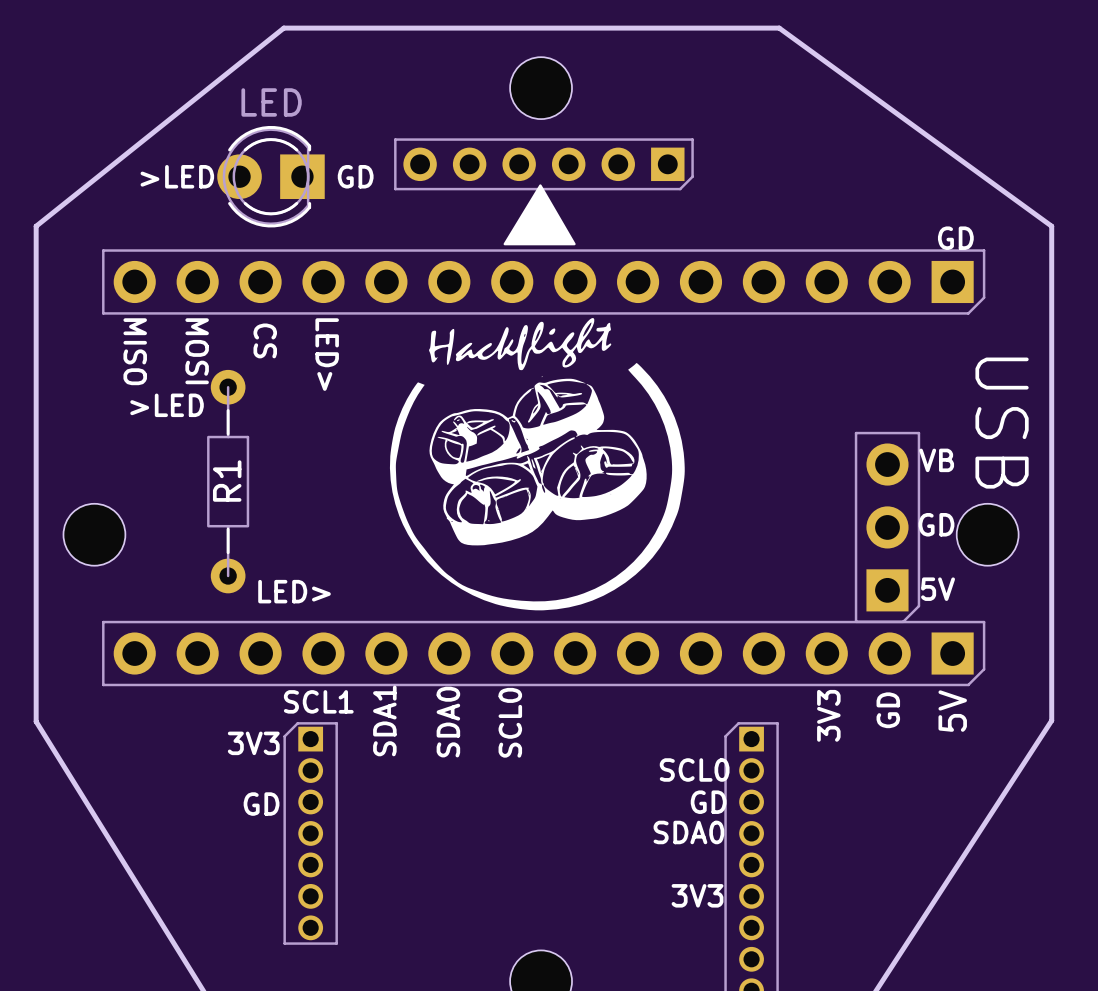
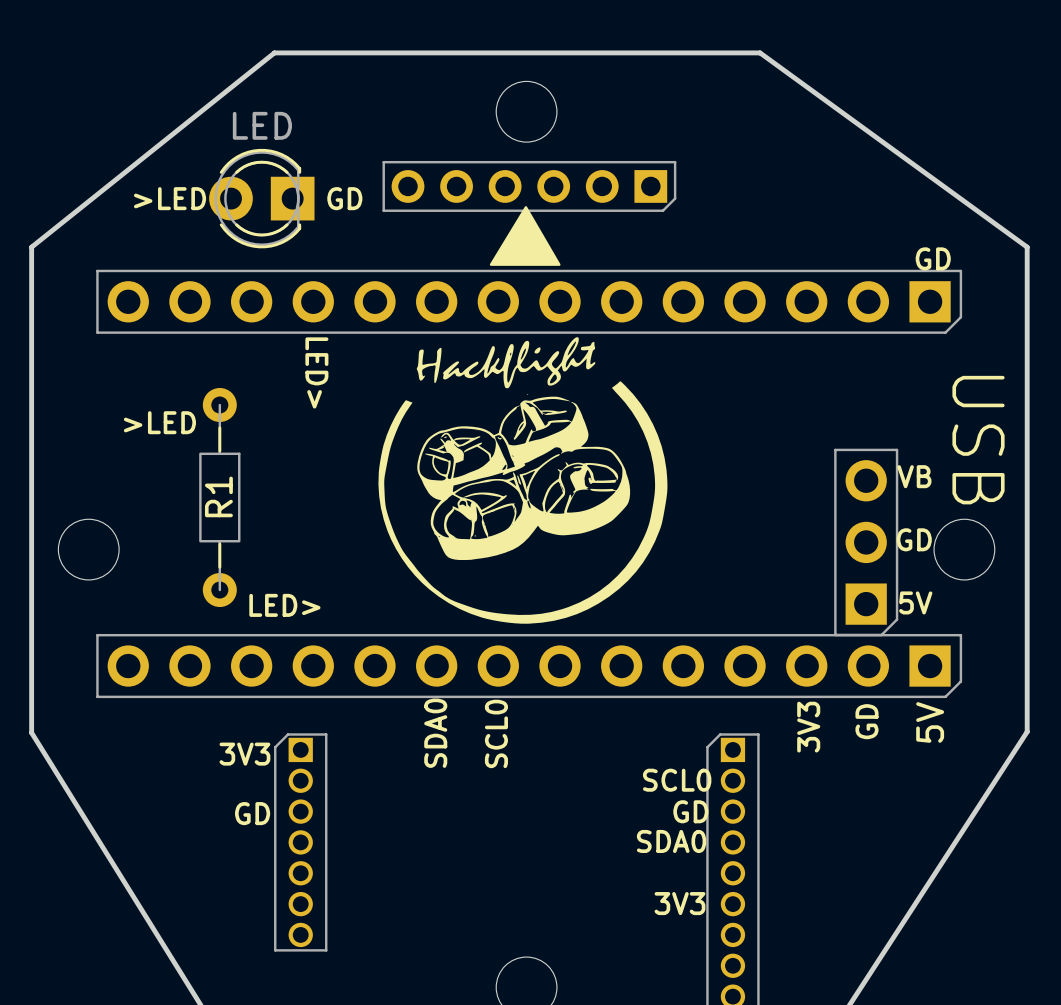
text: CS (265, 340) -> none
text: MISO (135, 351) -> none
text: MOSI (197, 351) -> none
text: SCL1 (318, 701) -> none
text: SDA1 (384, 720) -> none

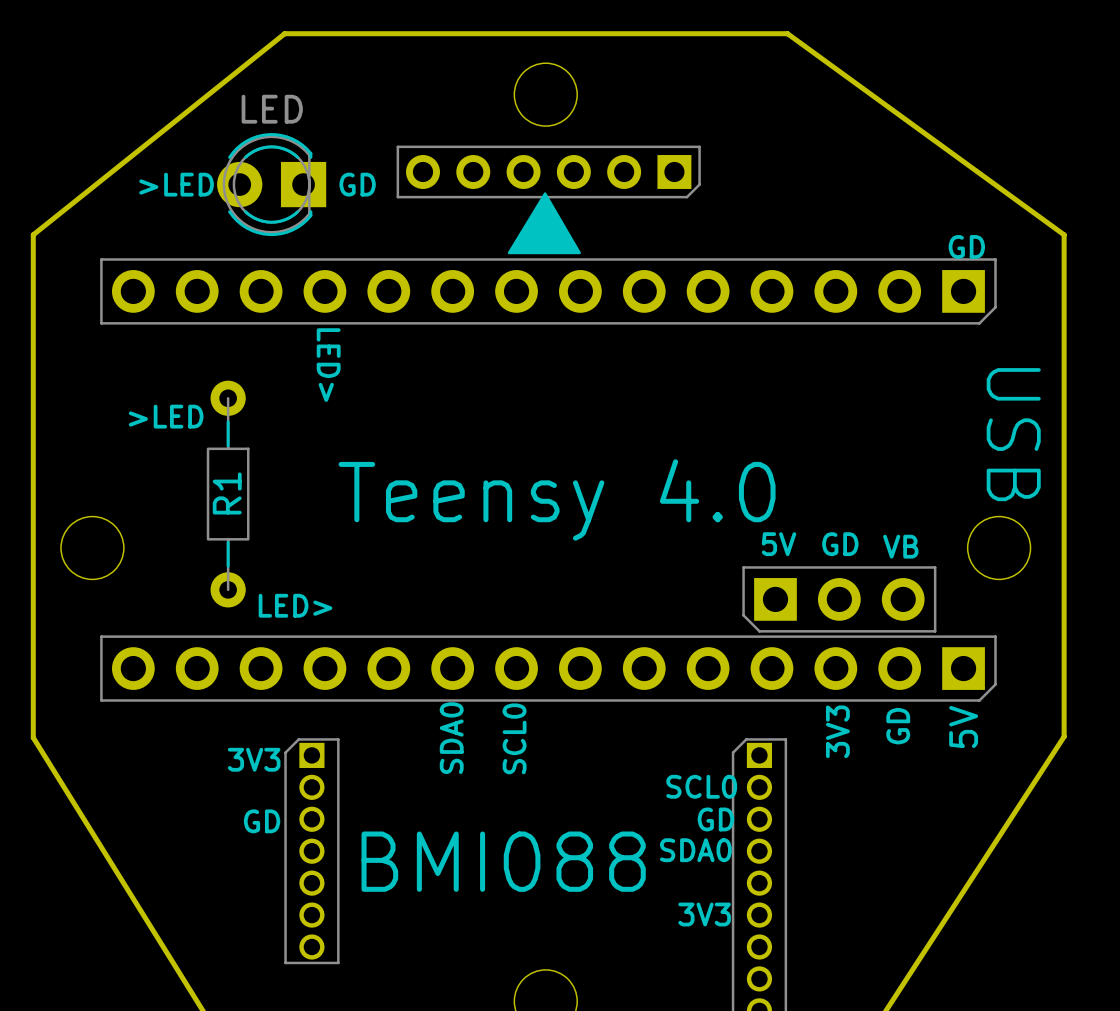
drawing: [378, 337, 668, 624] -> none
text position: VB (914, 476) -> VB (900, 546)
text: none -> Teensy 4.0 (557, 499)
text position: GD (914, 539) -> GD (840, 544)
part rotation: 0° (866, 542) -> 90° clockwise (839, 599)
text position: 5V (915, 602) -> 5V (779, 544)
text: none -> BMI088 (503, 861)

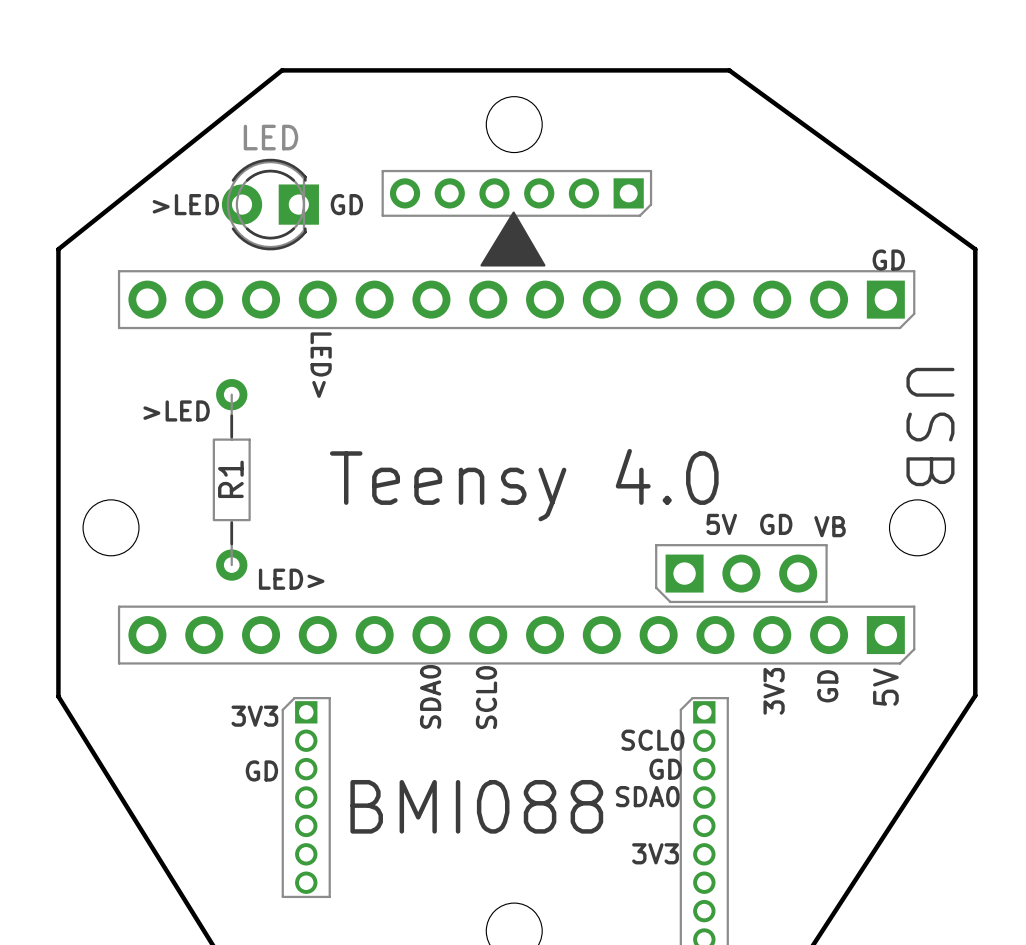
part position: (839, 599) -> (741, 573)

